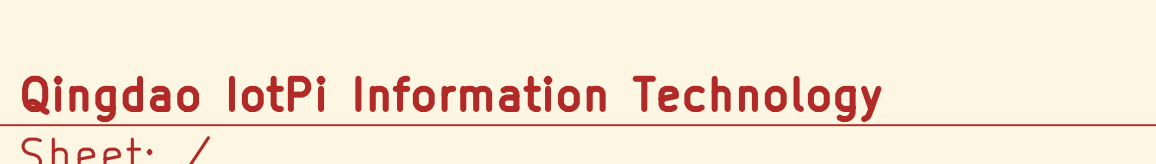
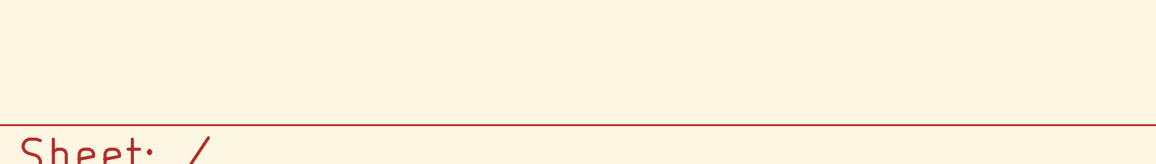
title block: Qingdao IotPi Information Technology (451, 98) -> none

